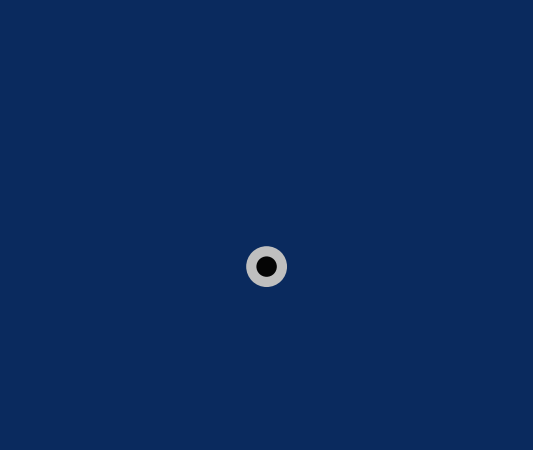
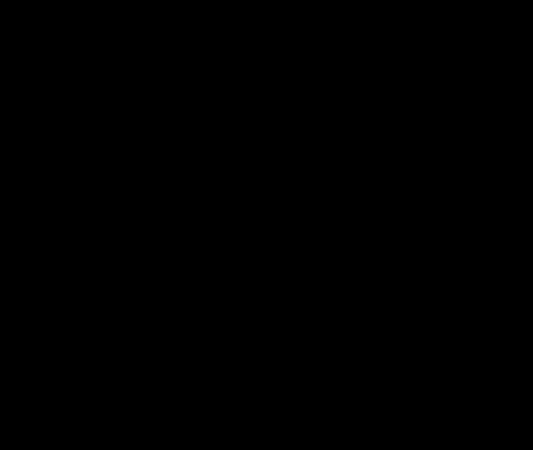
via: (266, 266) -> none

